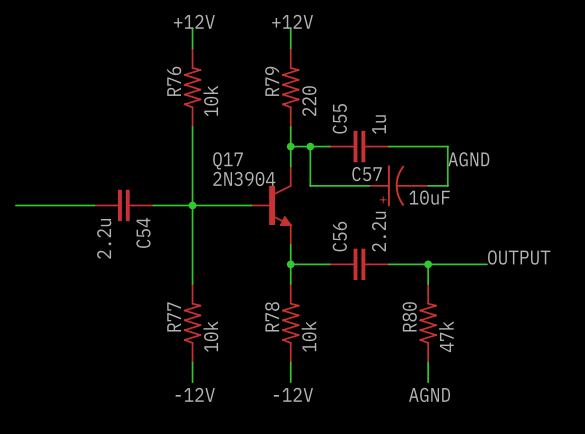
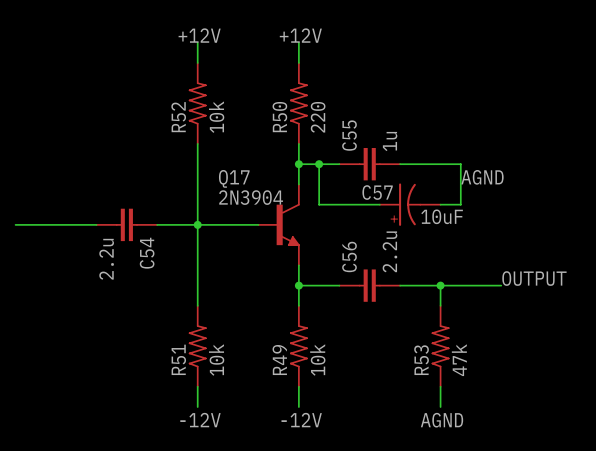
R76 name: R76 (174, 81) -> R52 (178, 117)
R79 name: R79 (272, 81) -> R50 (279, 117)
R77 name: R77 (174, 316) -> R51 (178, 359)
R78 name: R78 (272, 316) -> R49 (279, 360)
R80 name: R80 (409, 316) -> R53 (421, 360)

